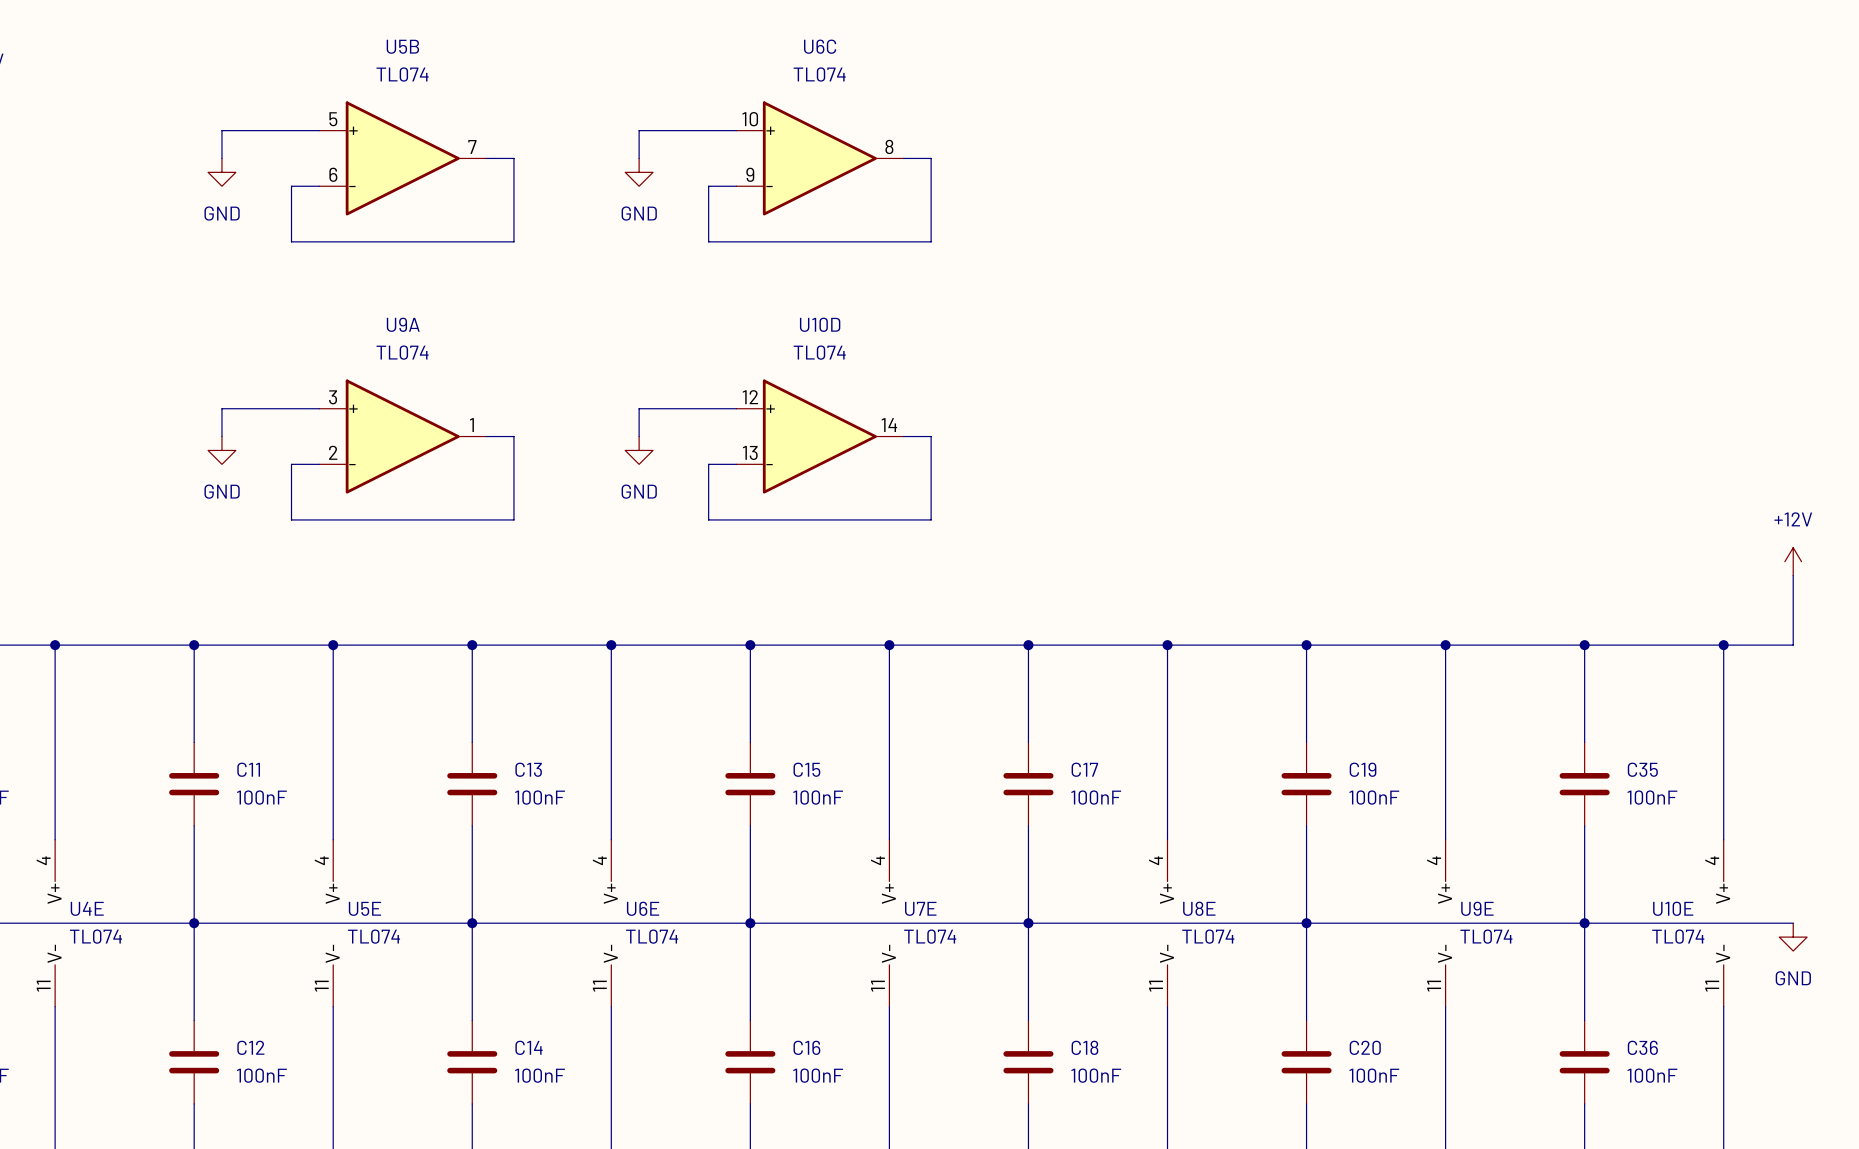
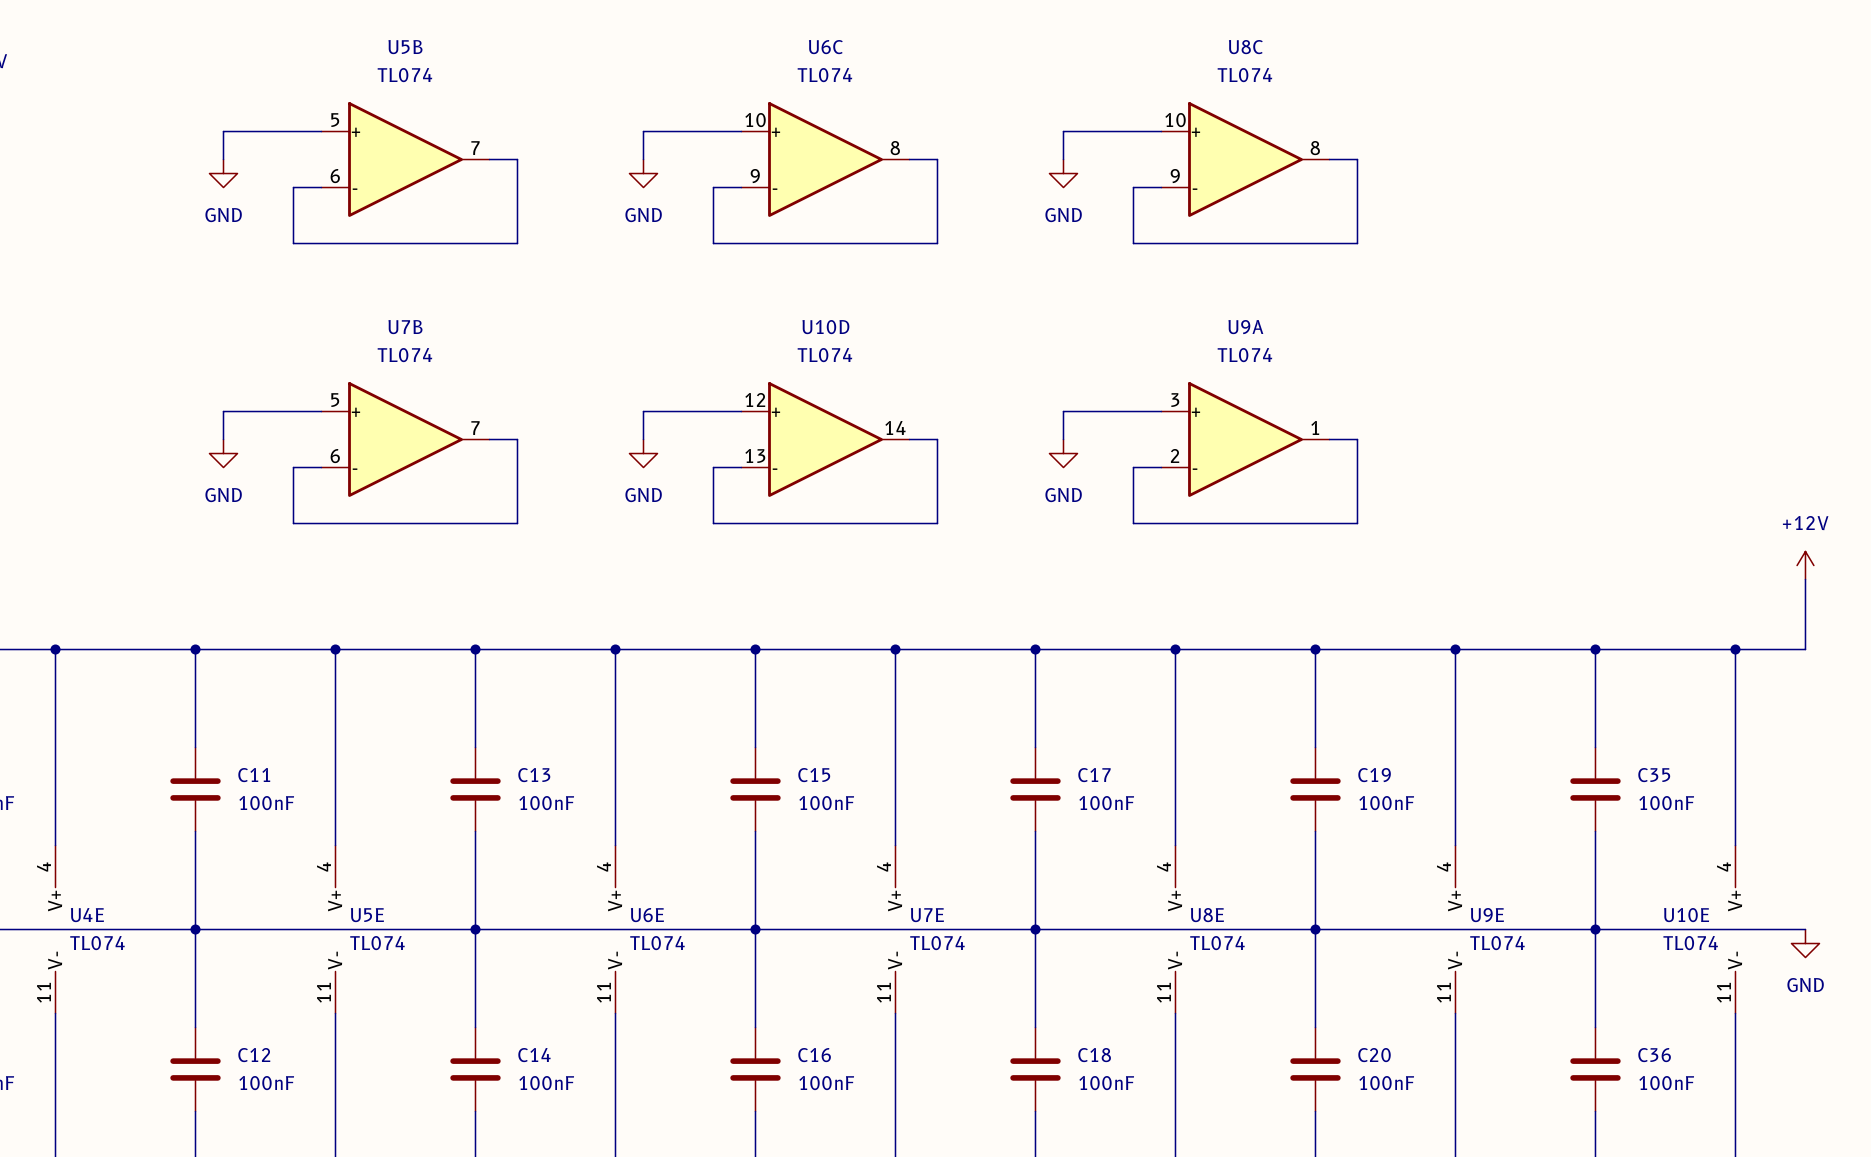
wire: none -> (1161, 131) (1063, 131) (1063, 159)
U8C: none -> TL074 (1245, 159)
wire: none -> (1329, 159) (1357, 159) (1357, 243) (1133, 243) (1133, 187) (1161, 187)
power symbol: none -> GND (1063, 173)
wire: none -> (1161, 411) (1063, 411) (1063, 439)
U9A position: (402, 436) -> (1245, 439)
U7B: none -> TL074 (405, 439)
wire: none -> (1329, 439) (1357, 439) (1357, 523) (1133, 523) (1133, 467) (1161, 467)
power symbol: none -> GND (1063, 453)

